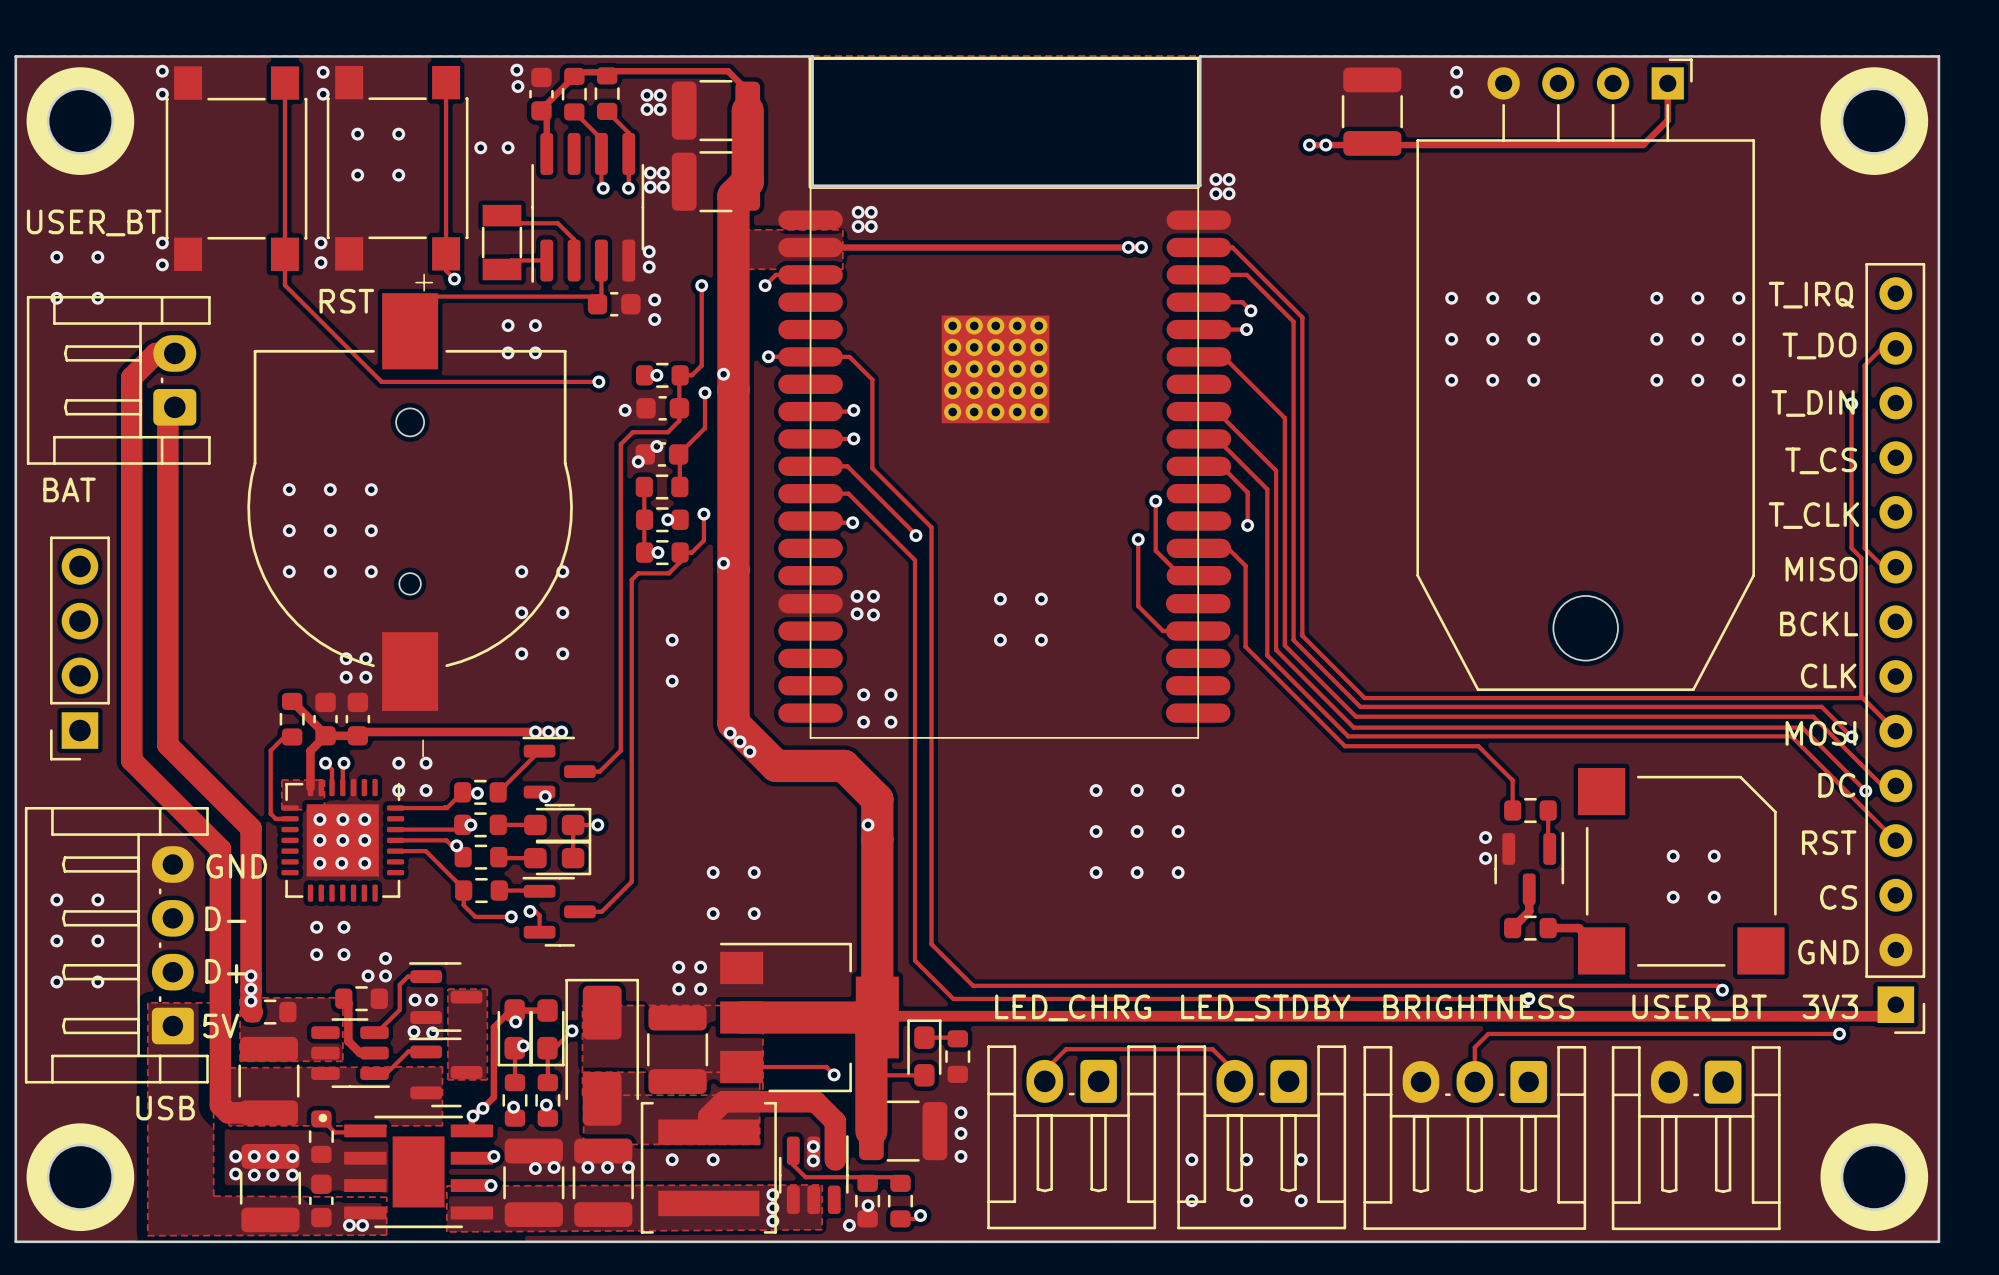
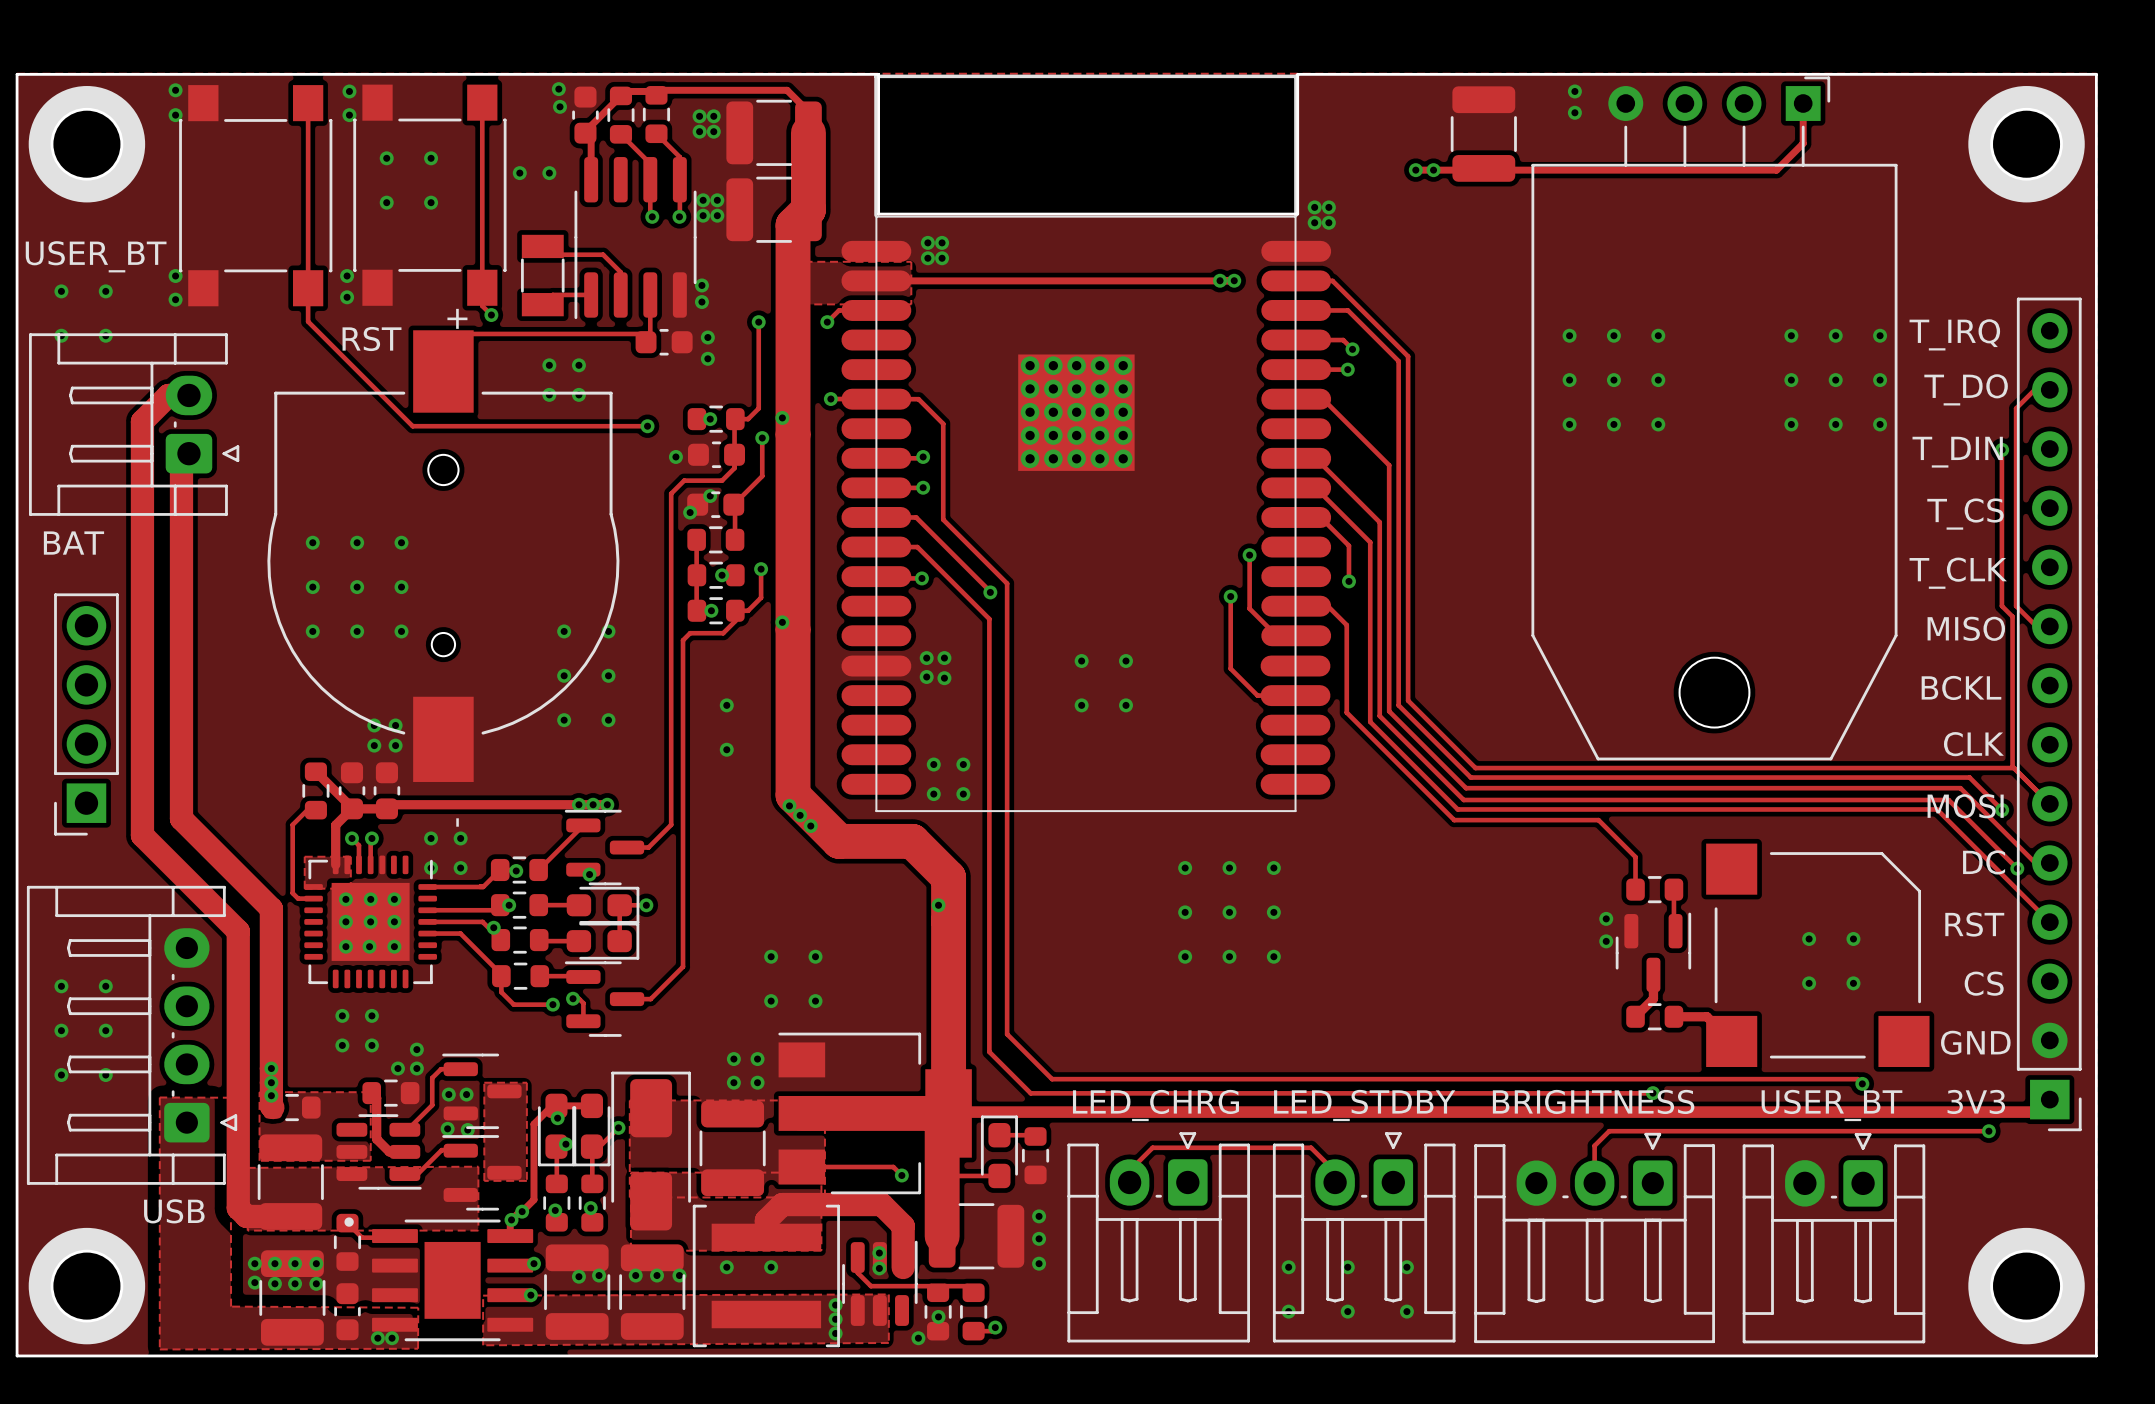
part footprint: [26, 295, 211, 465] -> [29, 333, 240, 516]
part footprint: [24, 807, 209, 1084] -> [26, 885, 238, 1185]
text: GND (236, 866) -> none
text: D- (225, 918) -> none
text: D+ (225, 971) -> none
text: 5V (221, 1026) -> none
part footprint: [987, 1045, 1157, 1230] -> [1067, 1132, 1250, 1343]
part footprint: [1177, 1045, 1347, 1230] -> [1272, 1132, 1456, 1343]
part footprint: [1363, 1045, 1587, 1230] -> [1474, 1132, 1715, 1344]
part footprint: [1611, 1046, 1781, 1231] -> [1742, 1133, 1926, 1344]

